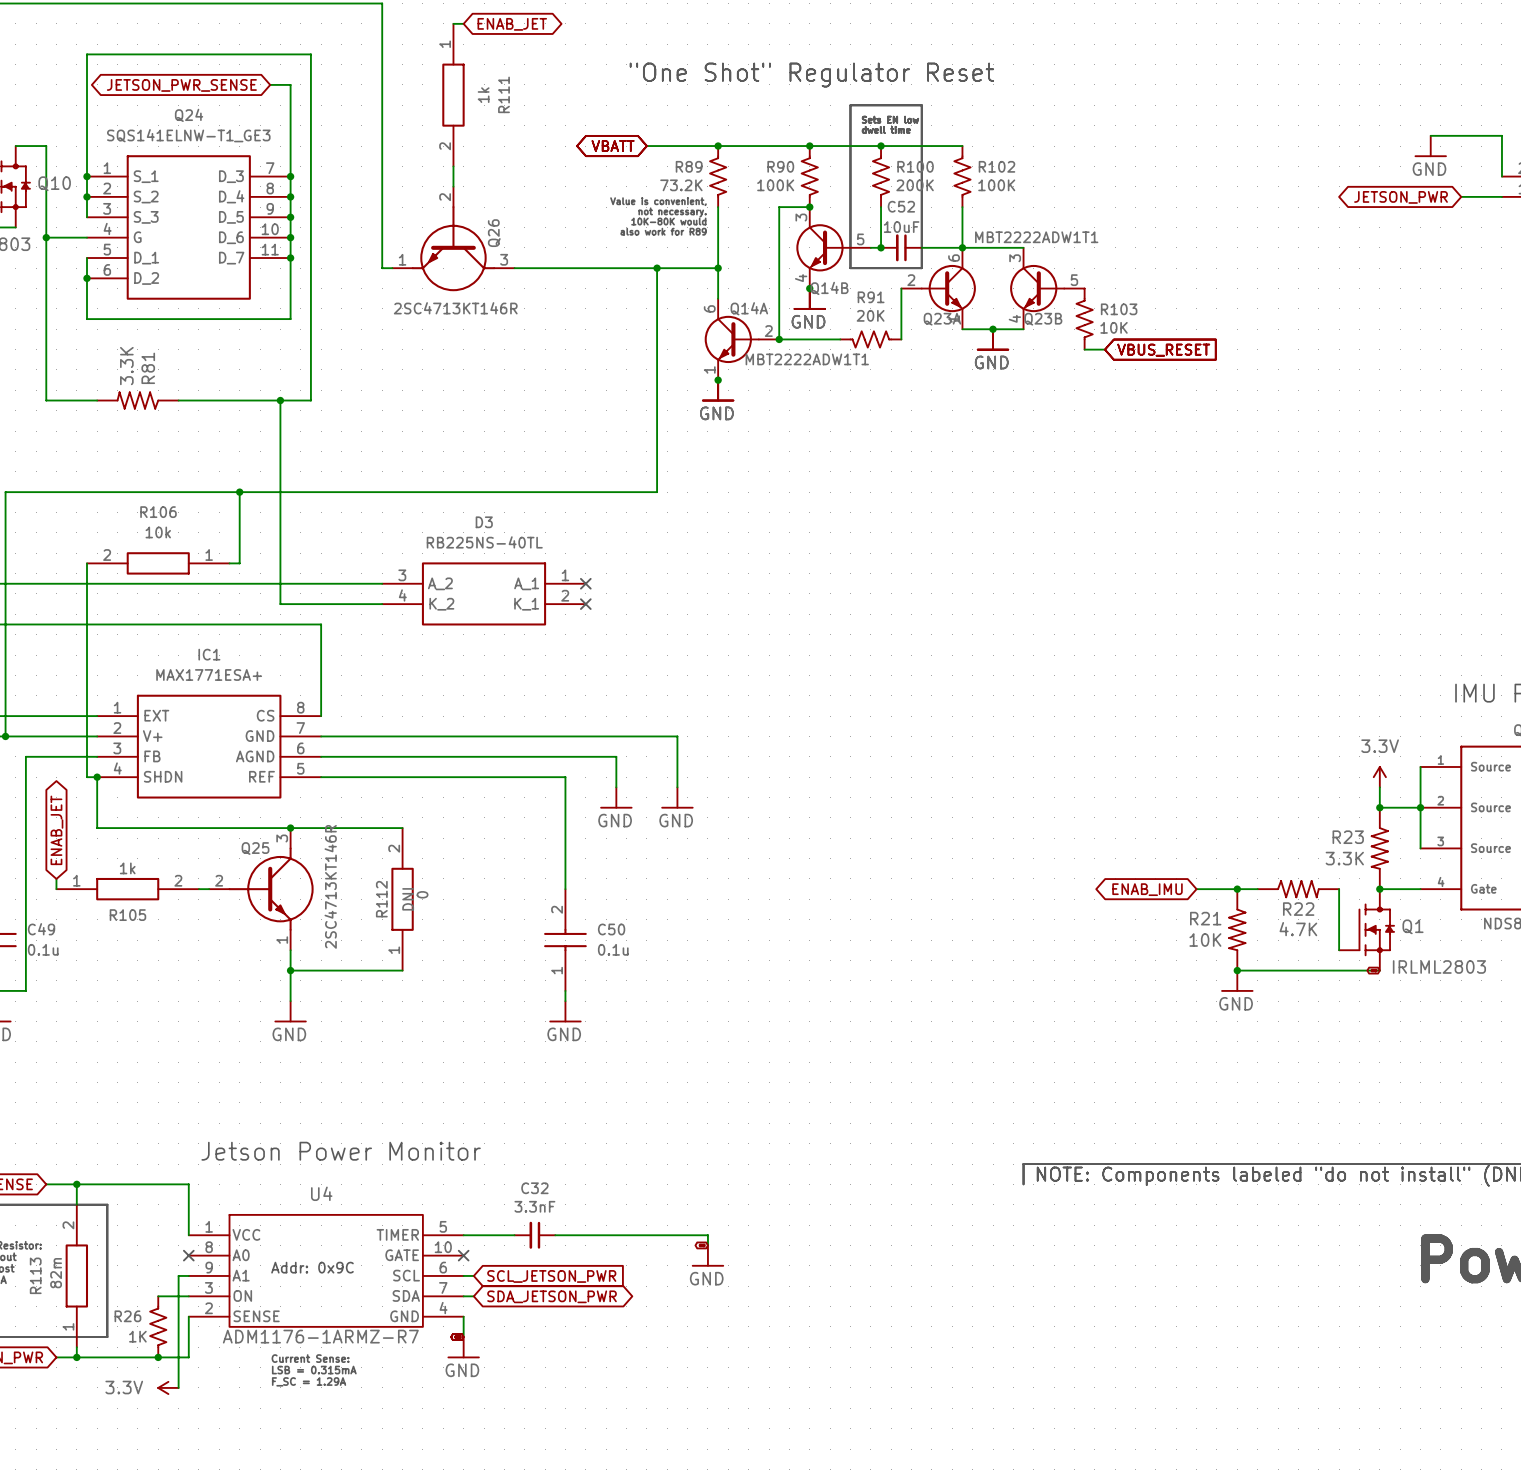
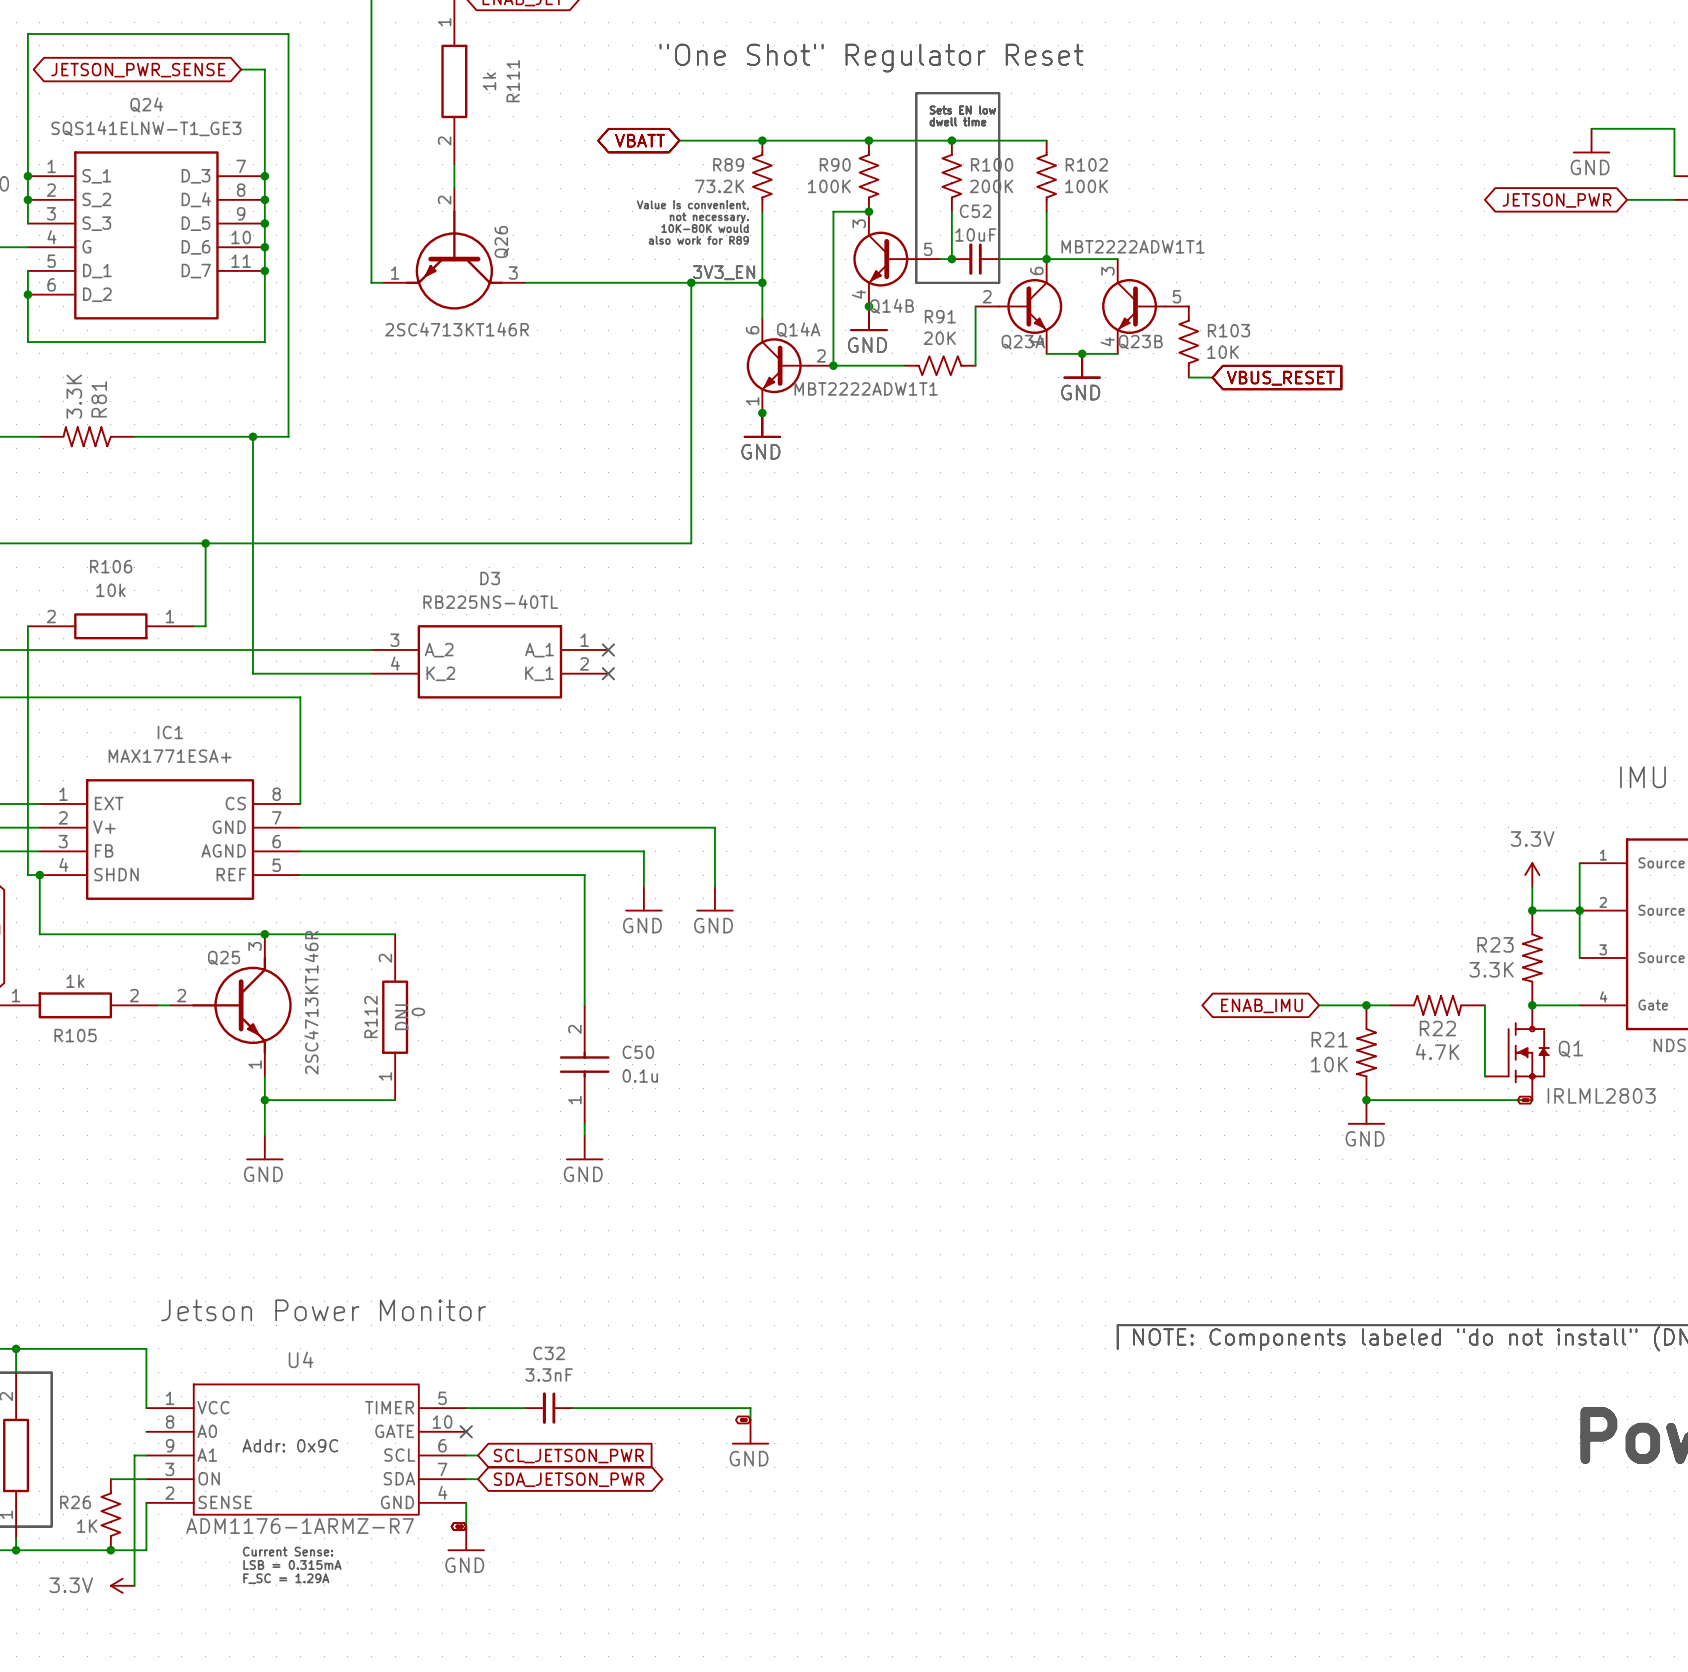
label: none -> 3V3_EN (724, 272)
no-connect mark: (188, 1255) -> none

